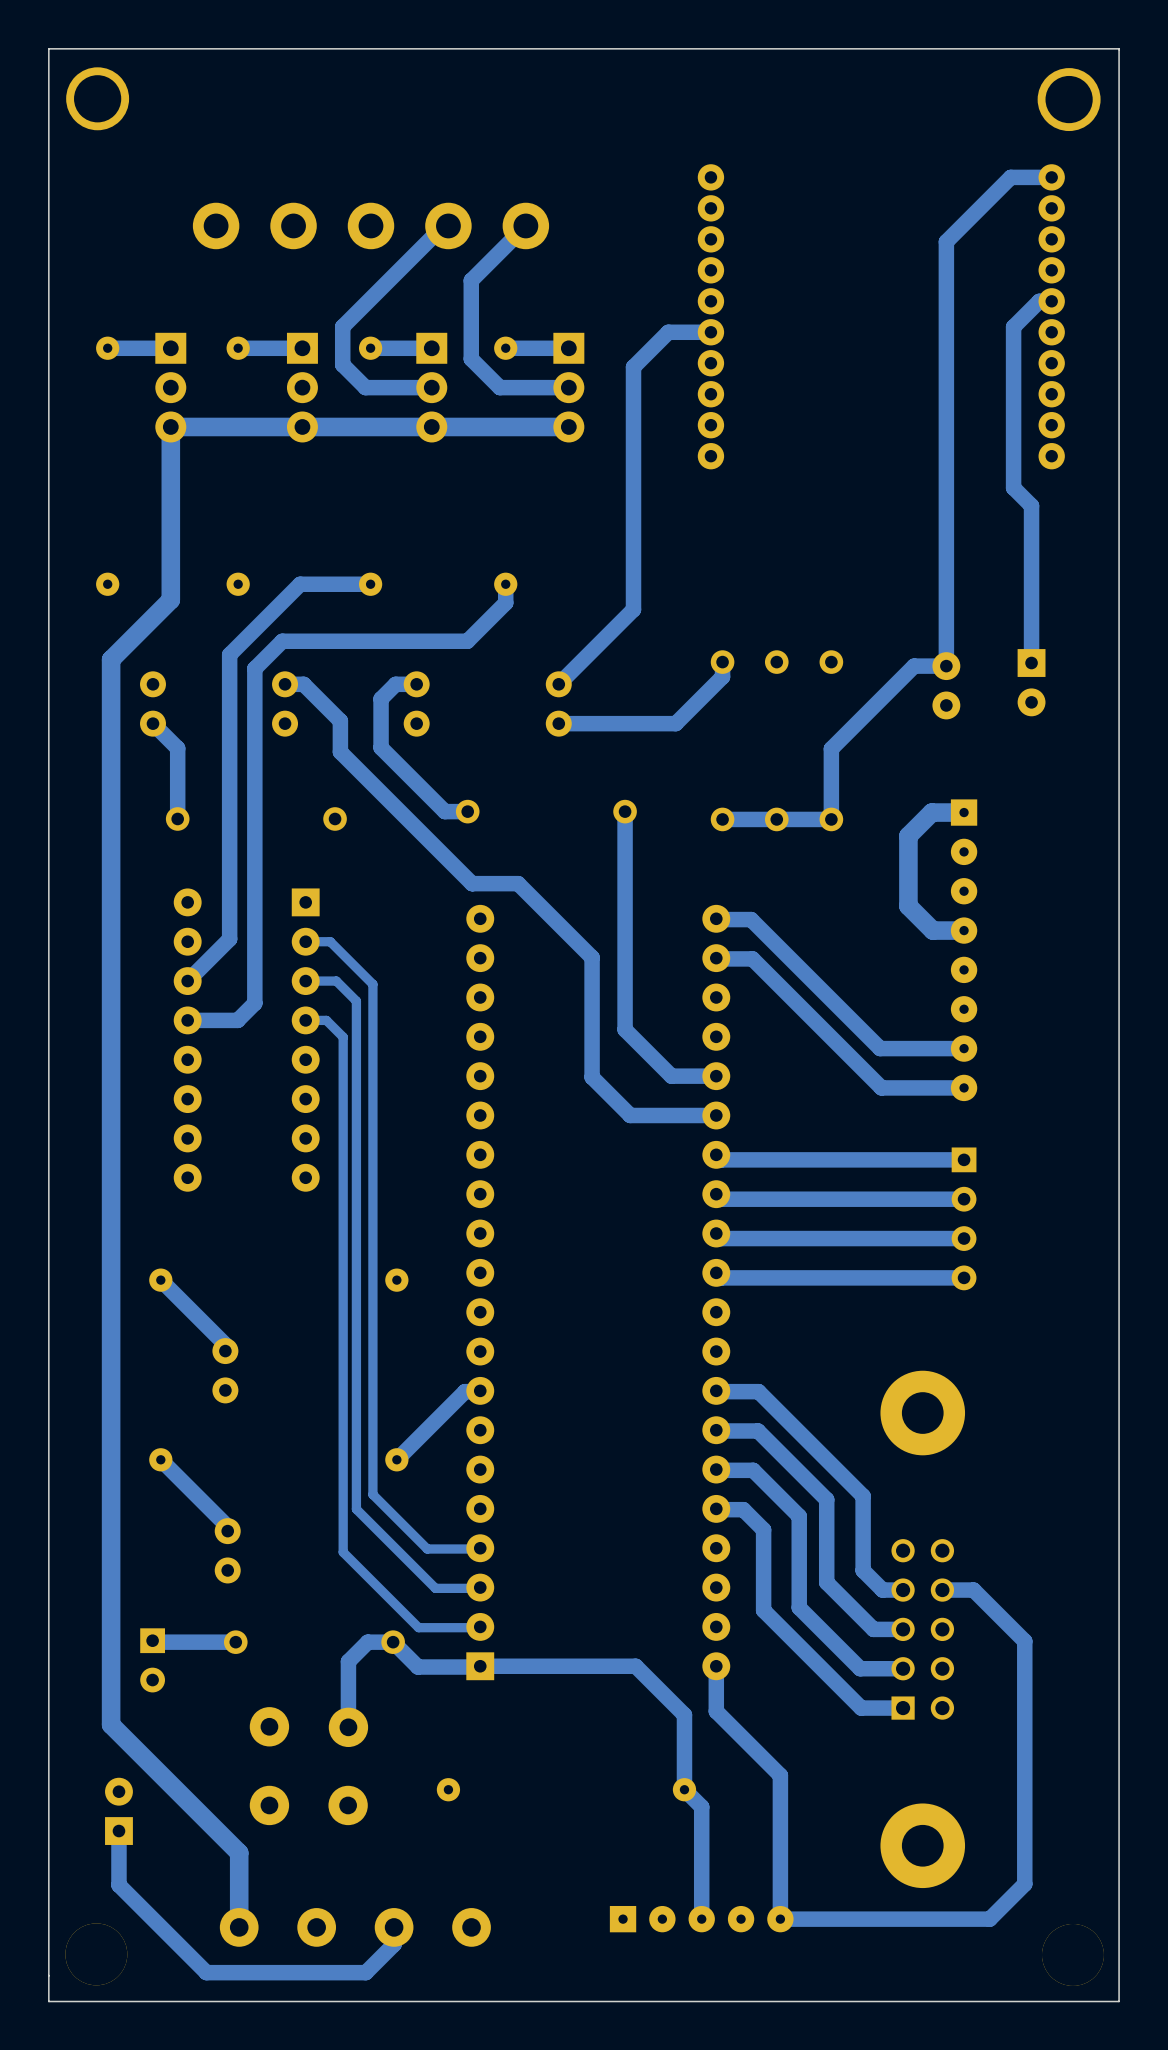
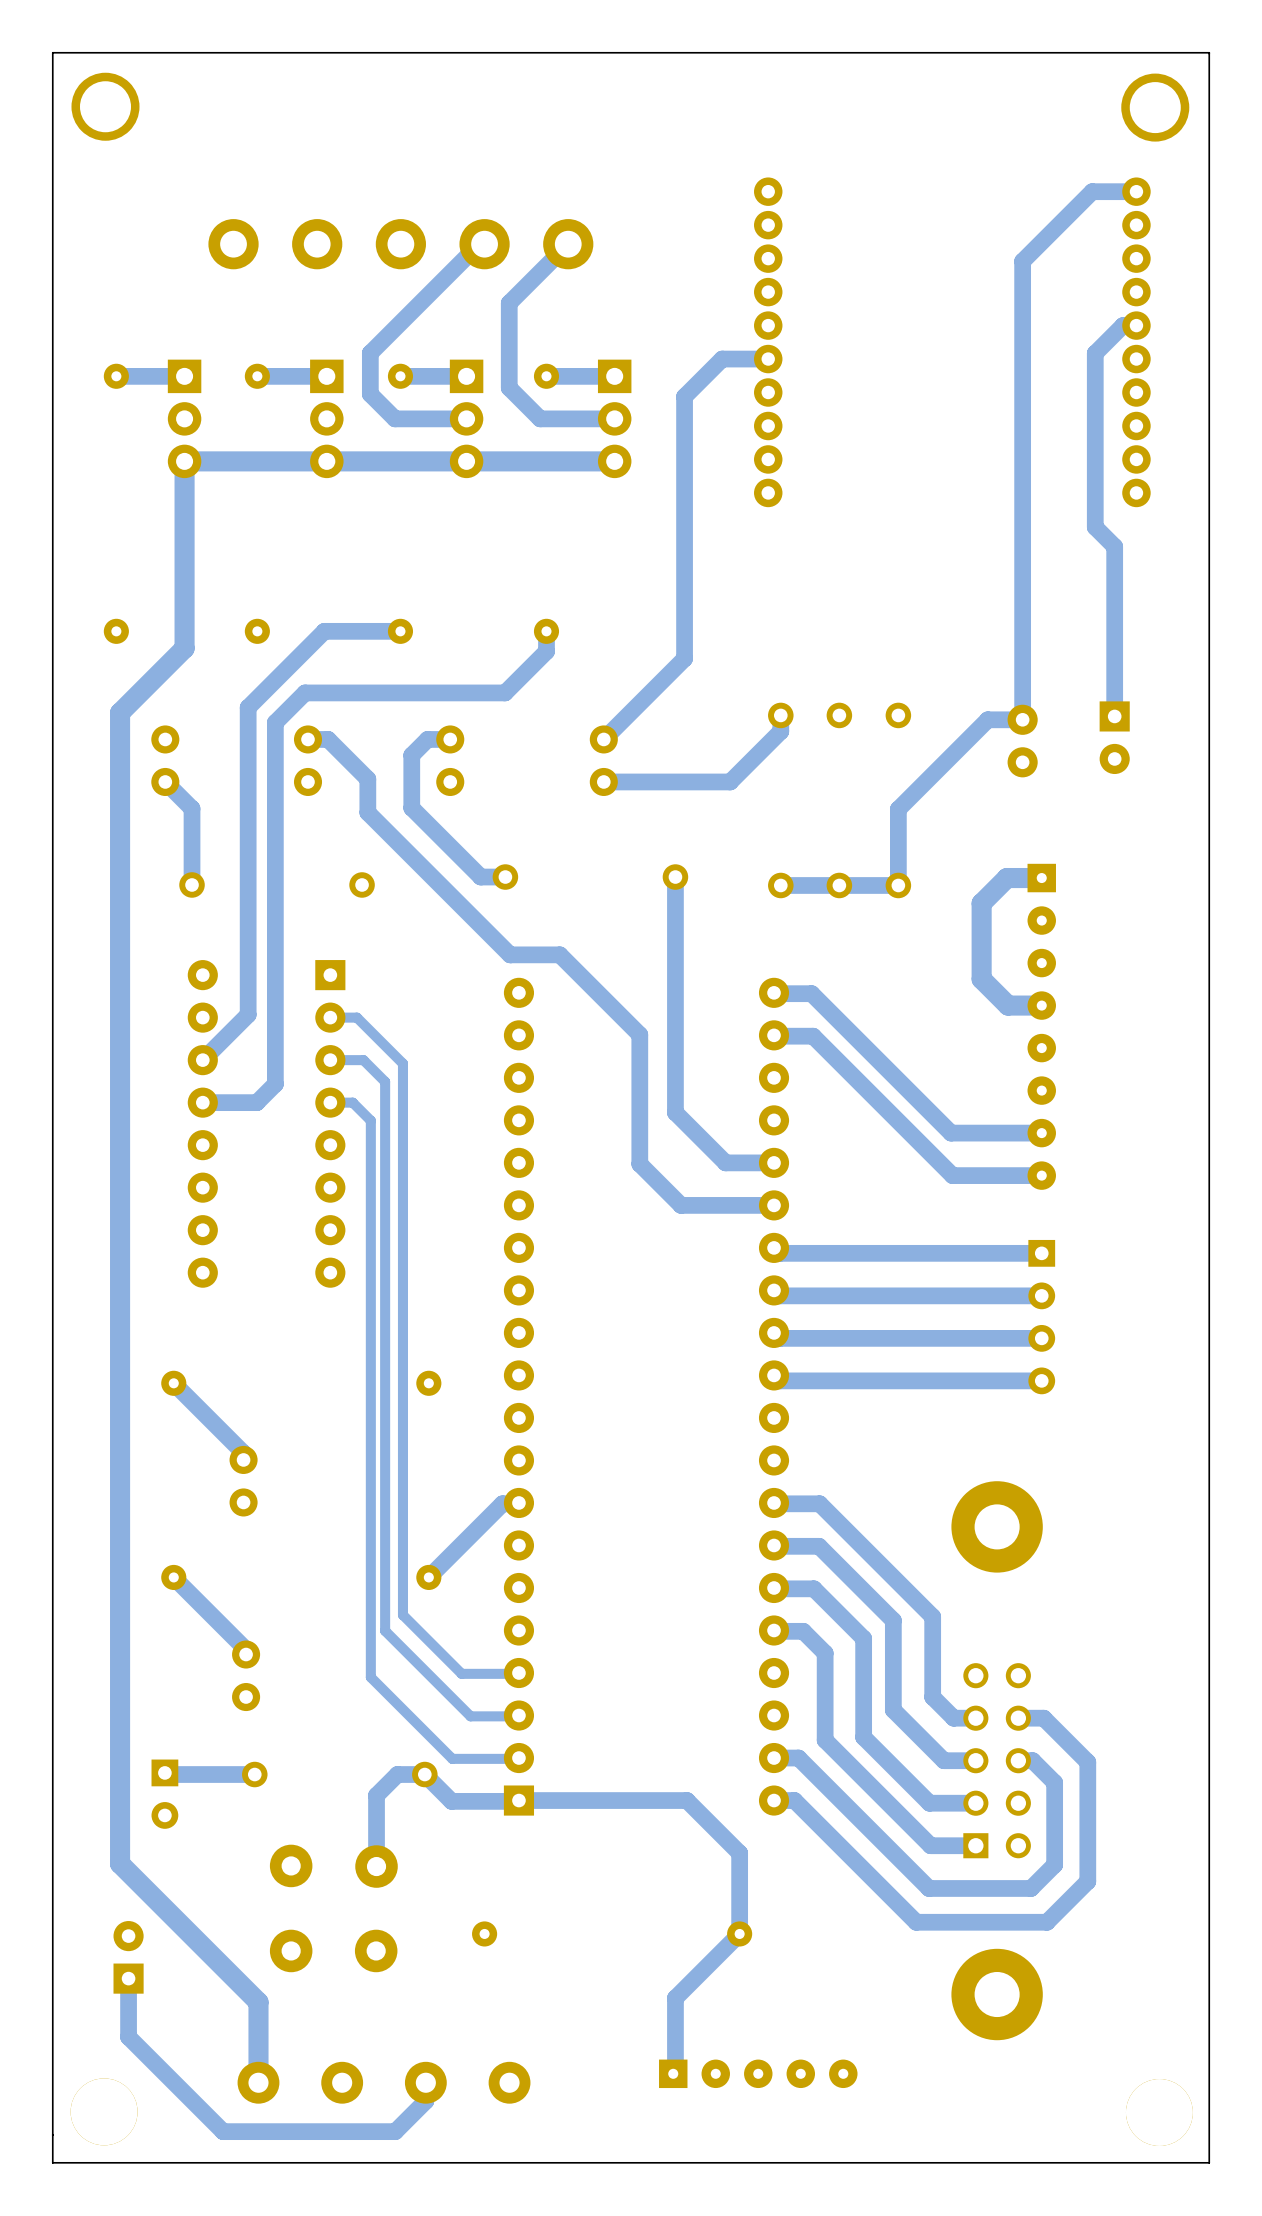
track: (965, 1590) (973, 1590) (1024, 1641) (1024, 1884) (989, 1919) (780, 1919) (780, 1775) (716, 1711) (716, 1666) -> (1043, 1718) (1087, 1762) (1087, 1881) (1046, 1922) (916, 1922) (794, 1800) (774, 1800)
track: none -> (774, 1758) (798, 1758) (929, 1888) (1031, 1888) (1054, 1864) (1054, 1782) (1032, 1760) (1018, 1760)
track: (684, 1789) (701, 1806) (701, 1919) -> (739, 1933) (675, 1998) (675, 2070)

